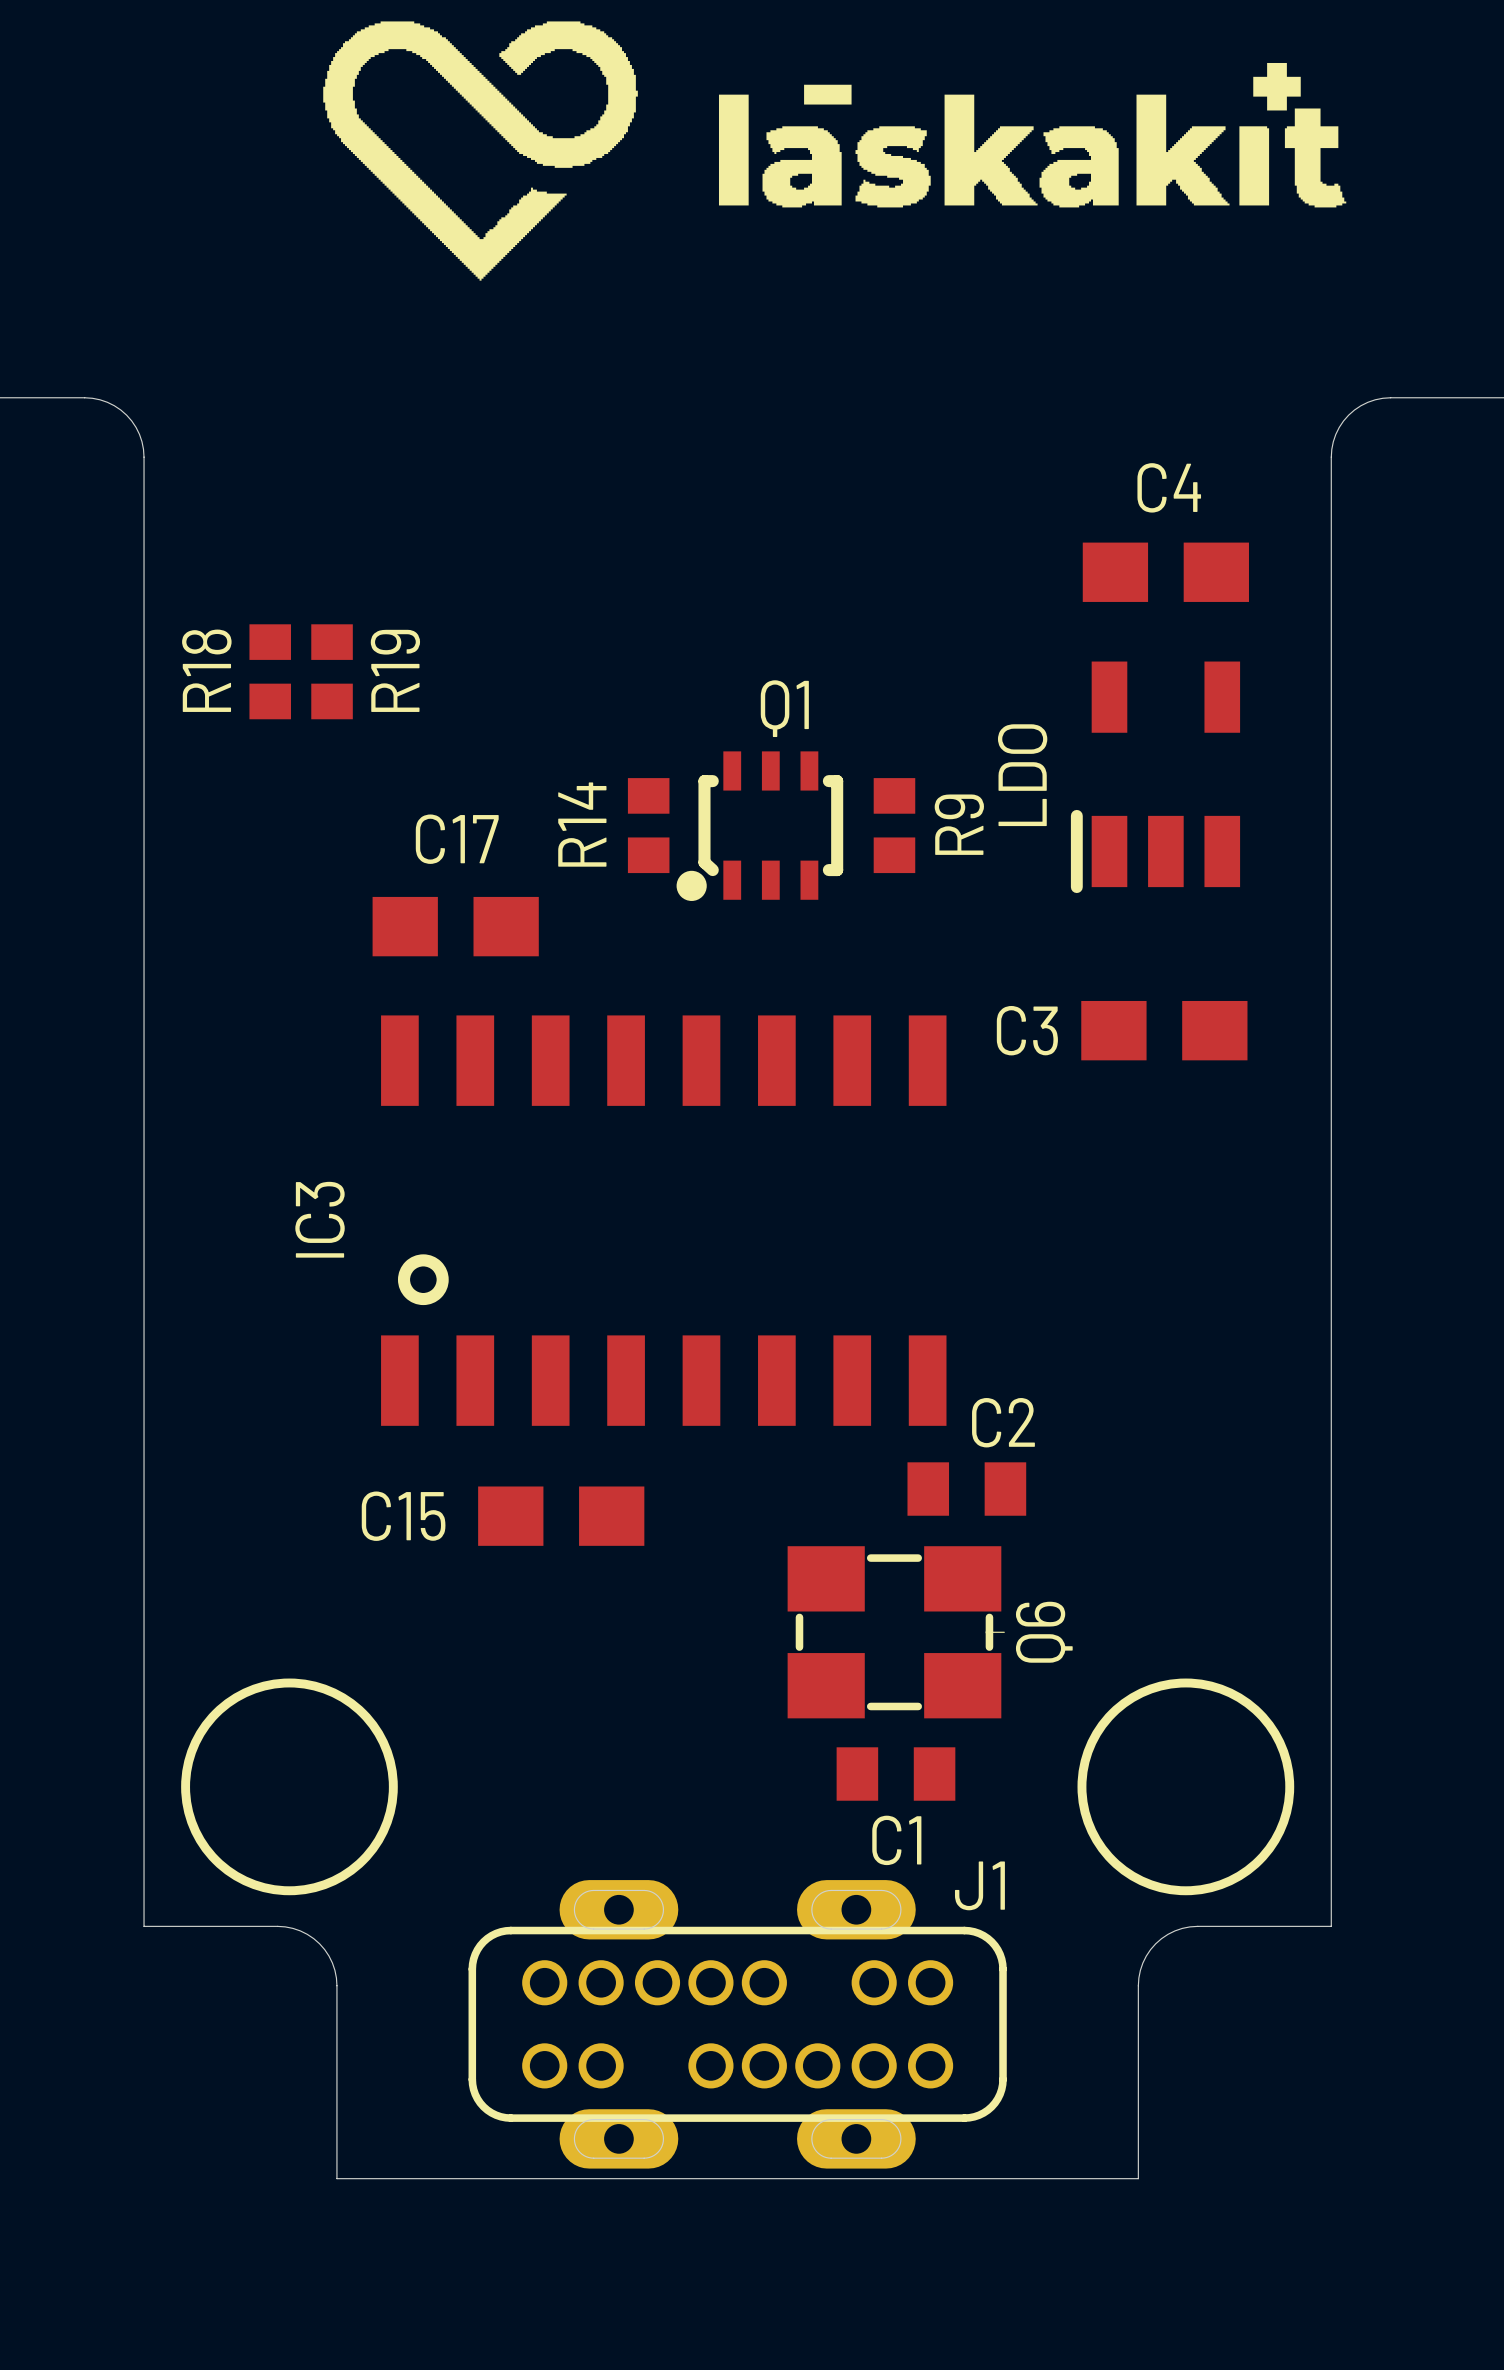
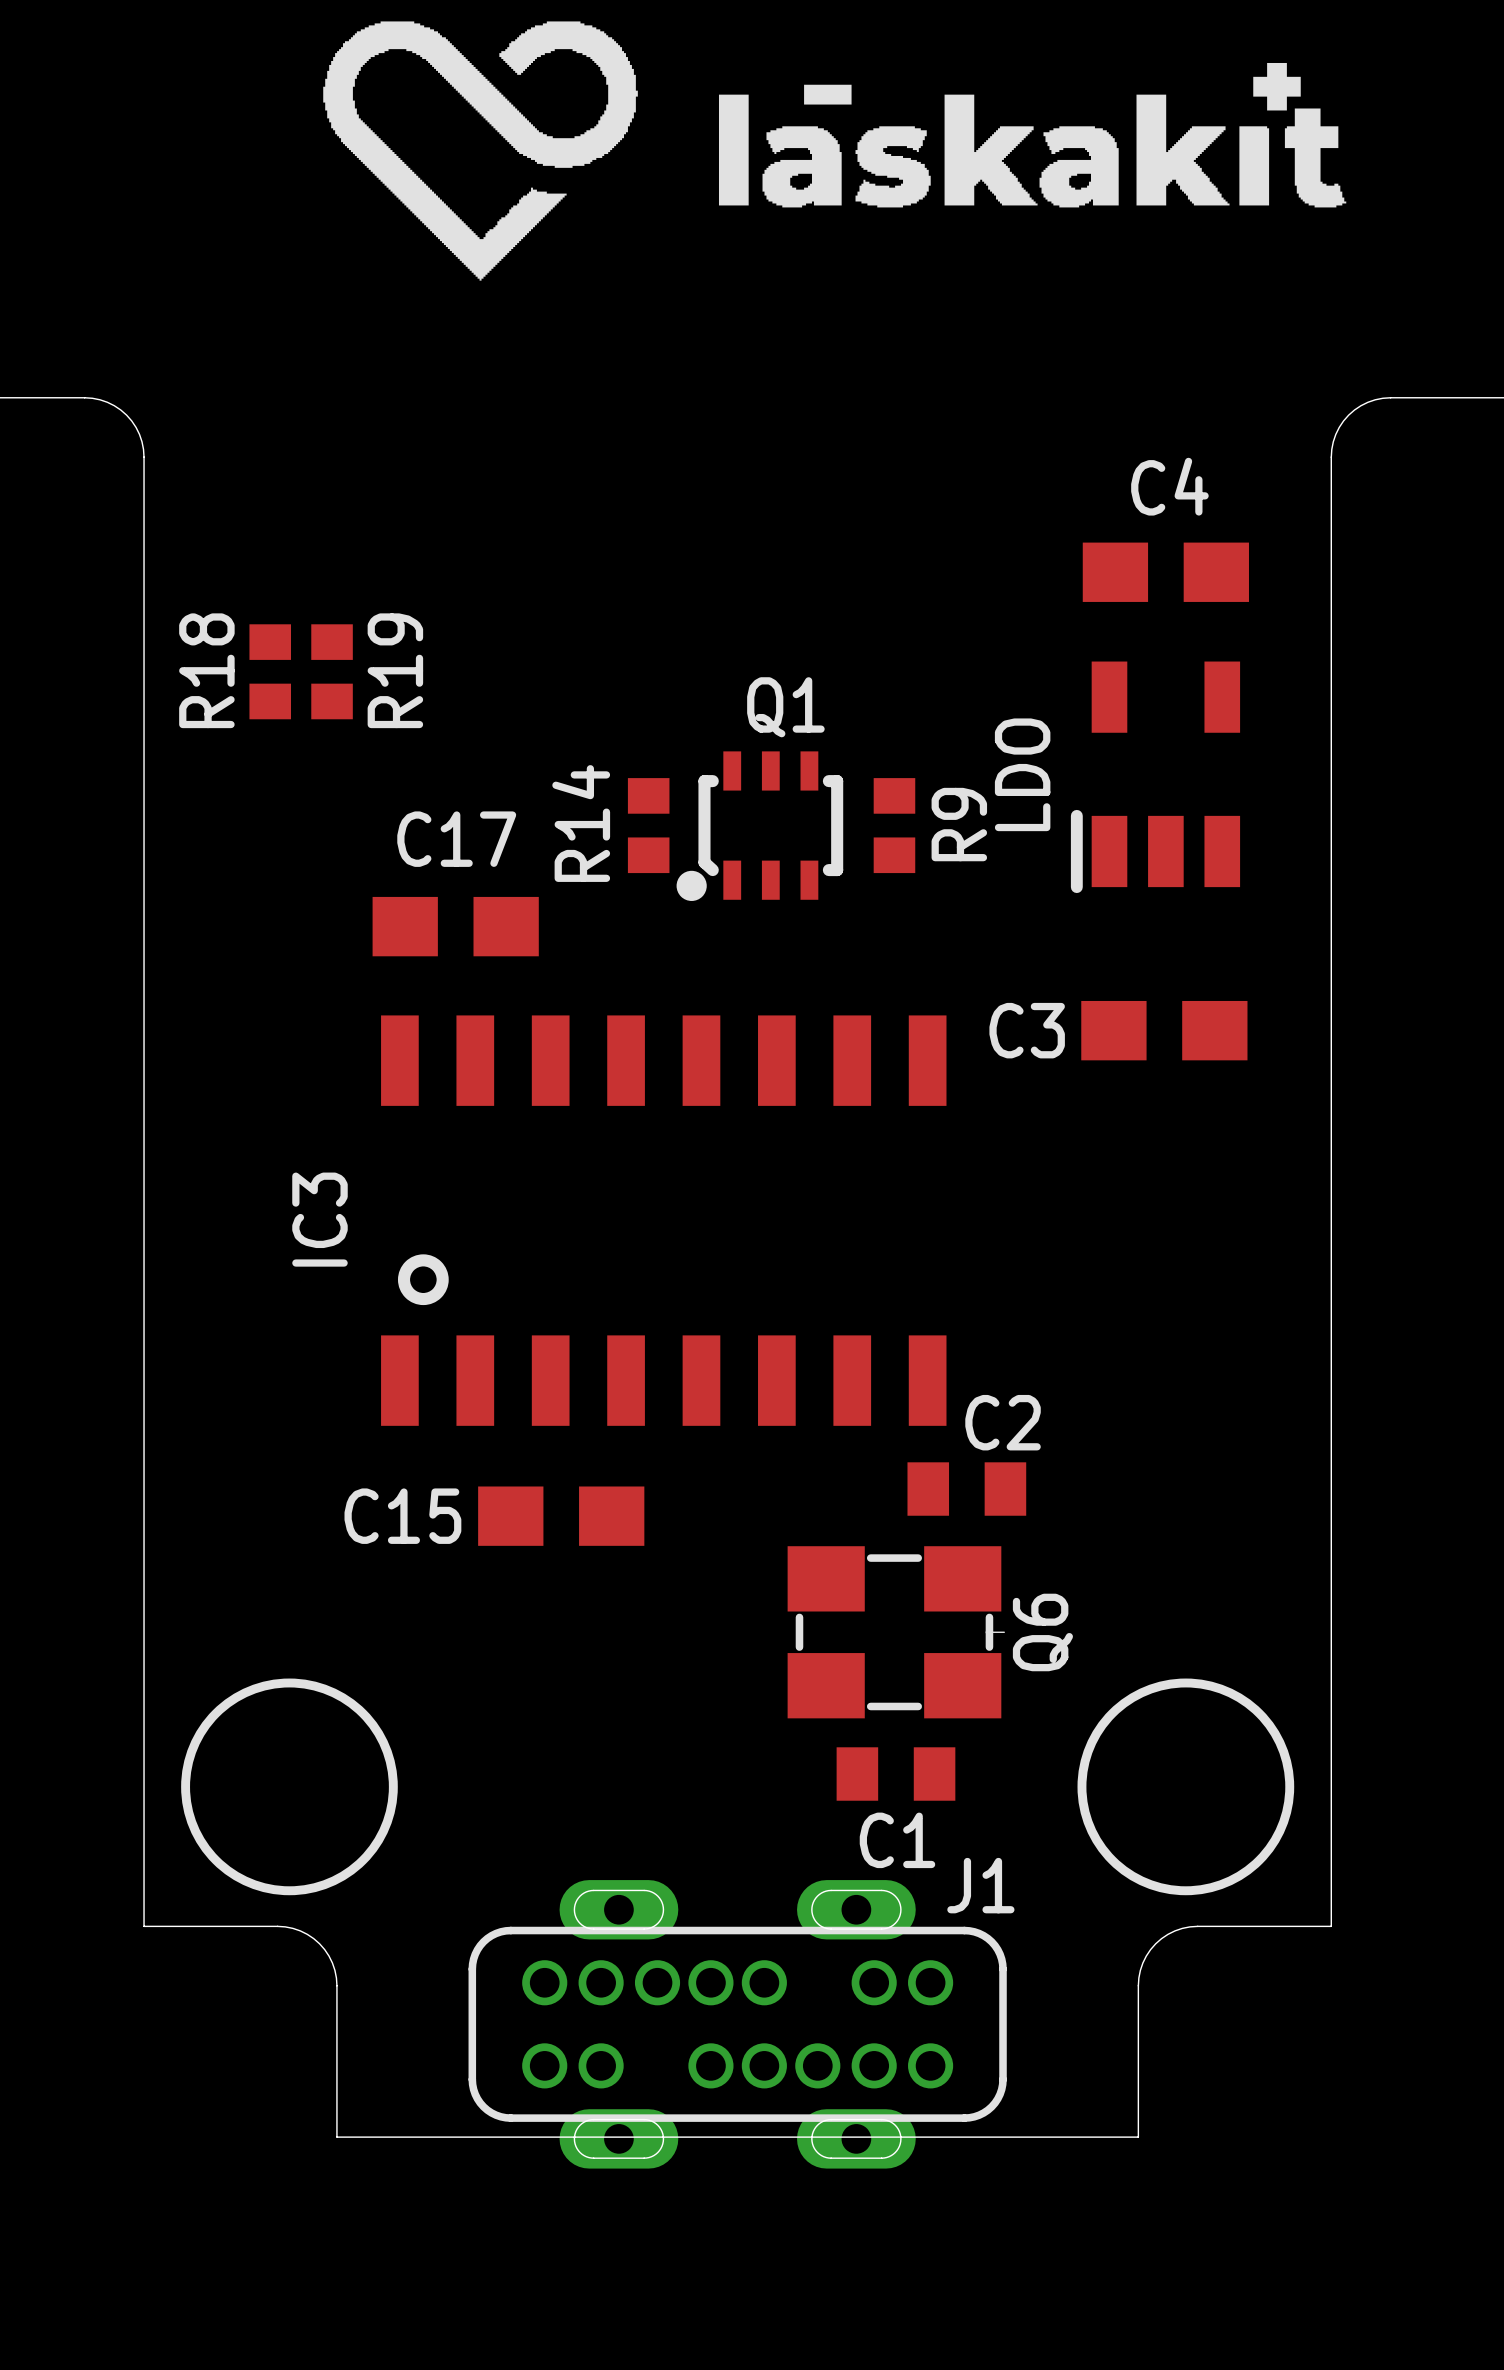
board edge: (336, 2137) (336, 2178) (1138, 2178) (1138, 2137) -> (336, 2137) (1138, 2137)

